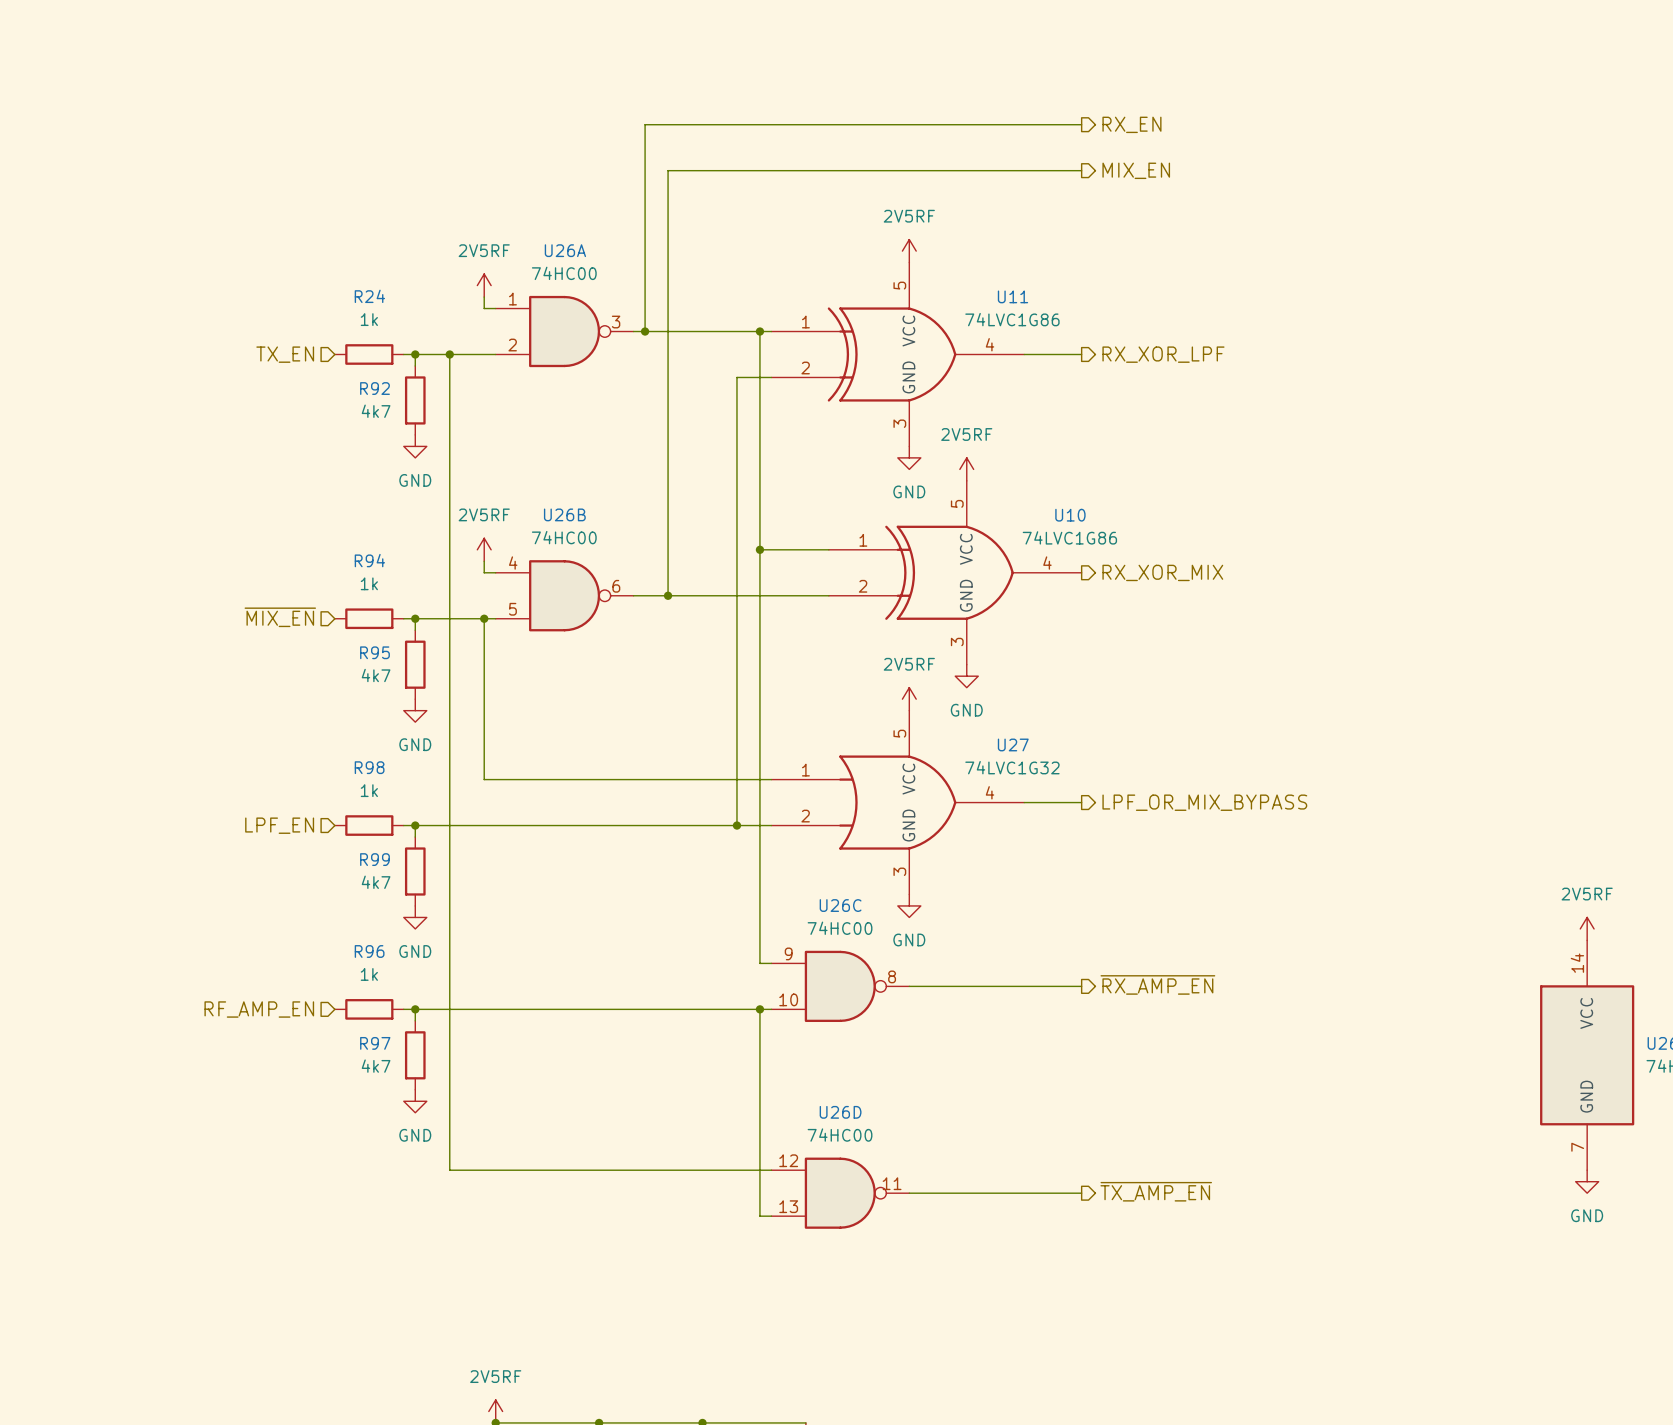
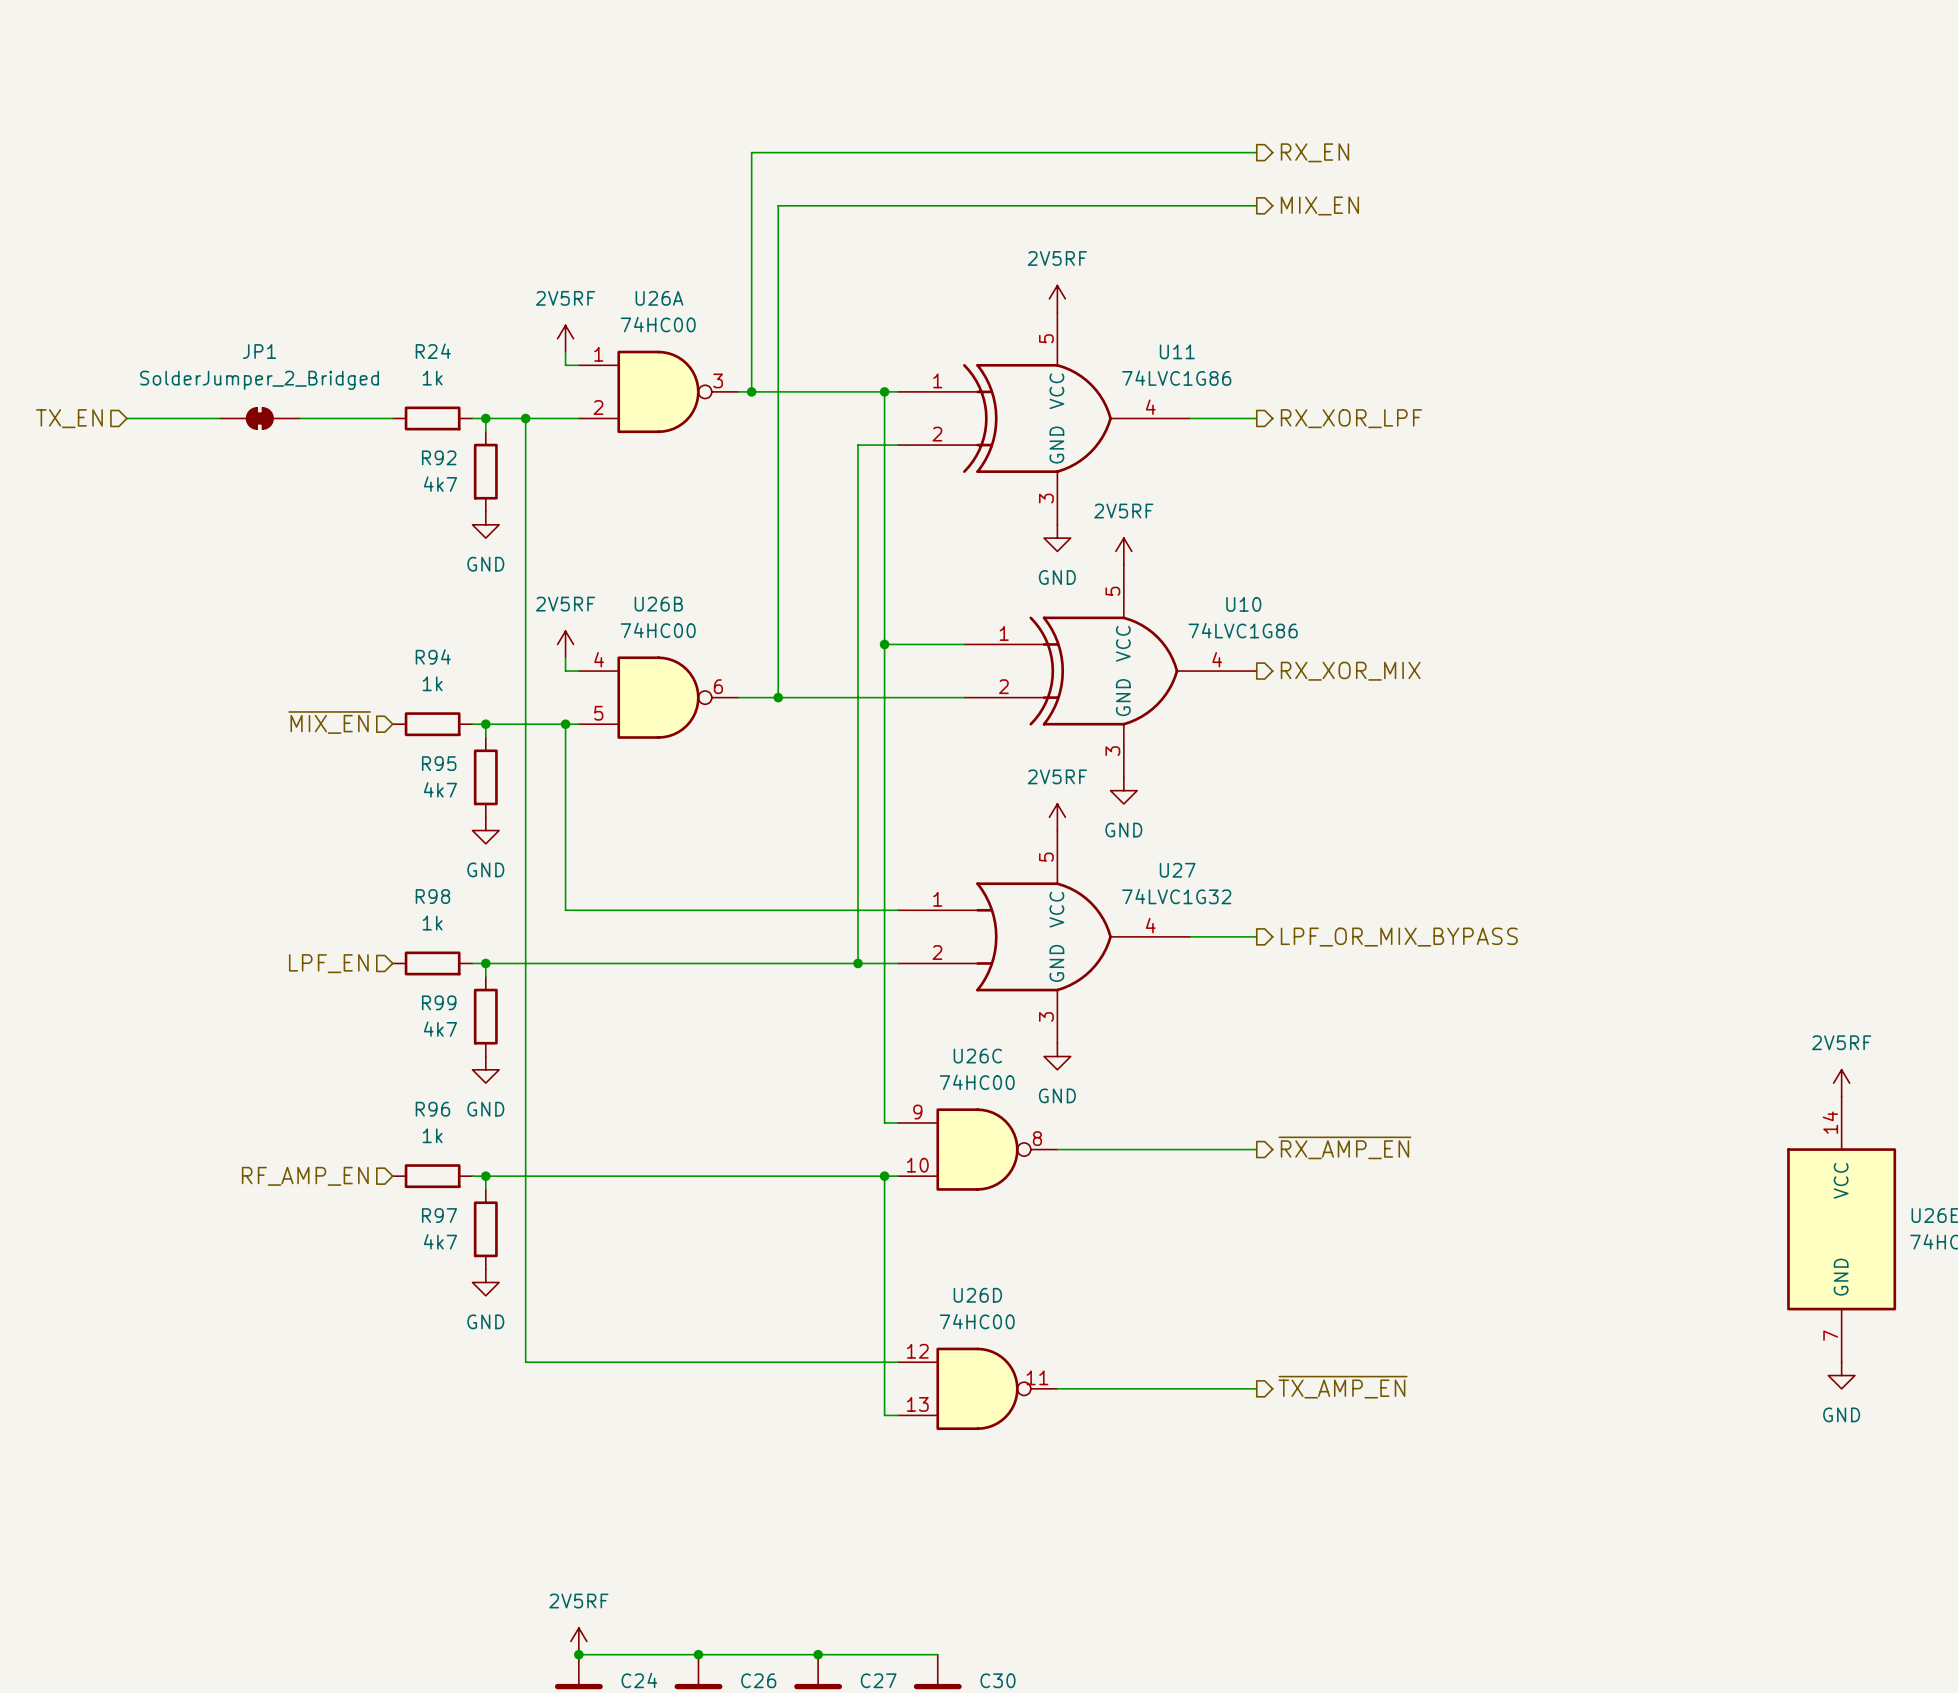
hierarchical label: none -> TX_EN (69, 418)
wire: none -> (126, 418) (219, 418)
JP1: none -> SolderJumper_2_Bridged (259, 418)
wire: none -> (299, 418) (392, 418)
hierarchical label: TX_EN (285, 354) -> none

